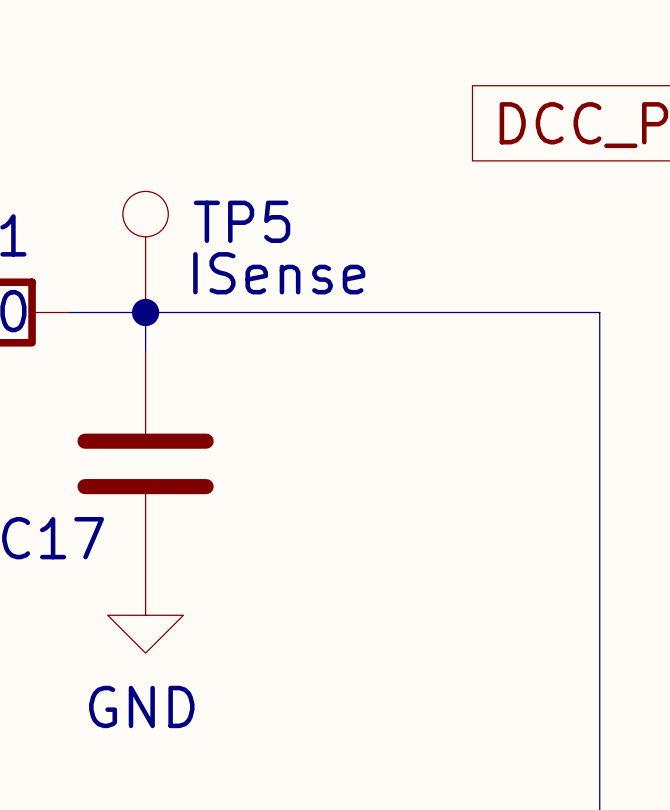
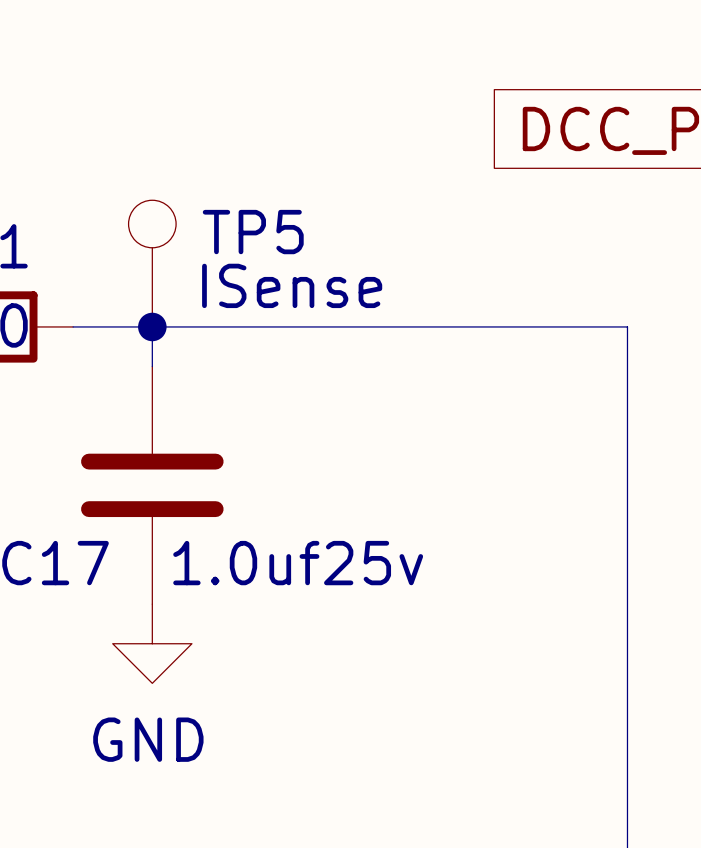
C17 value: none -> 1.0uf25v (298, 563)

